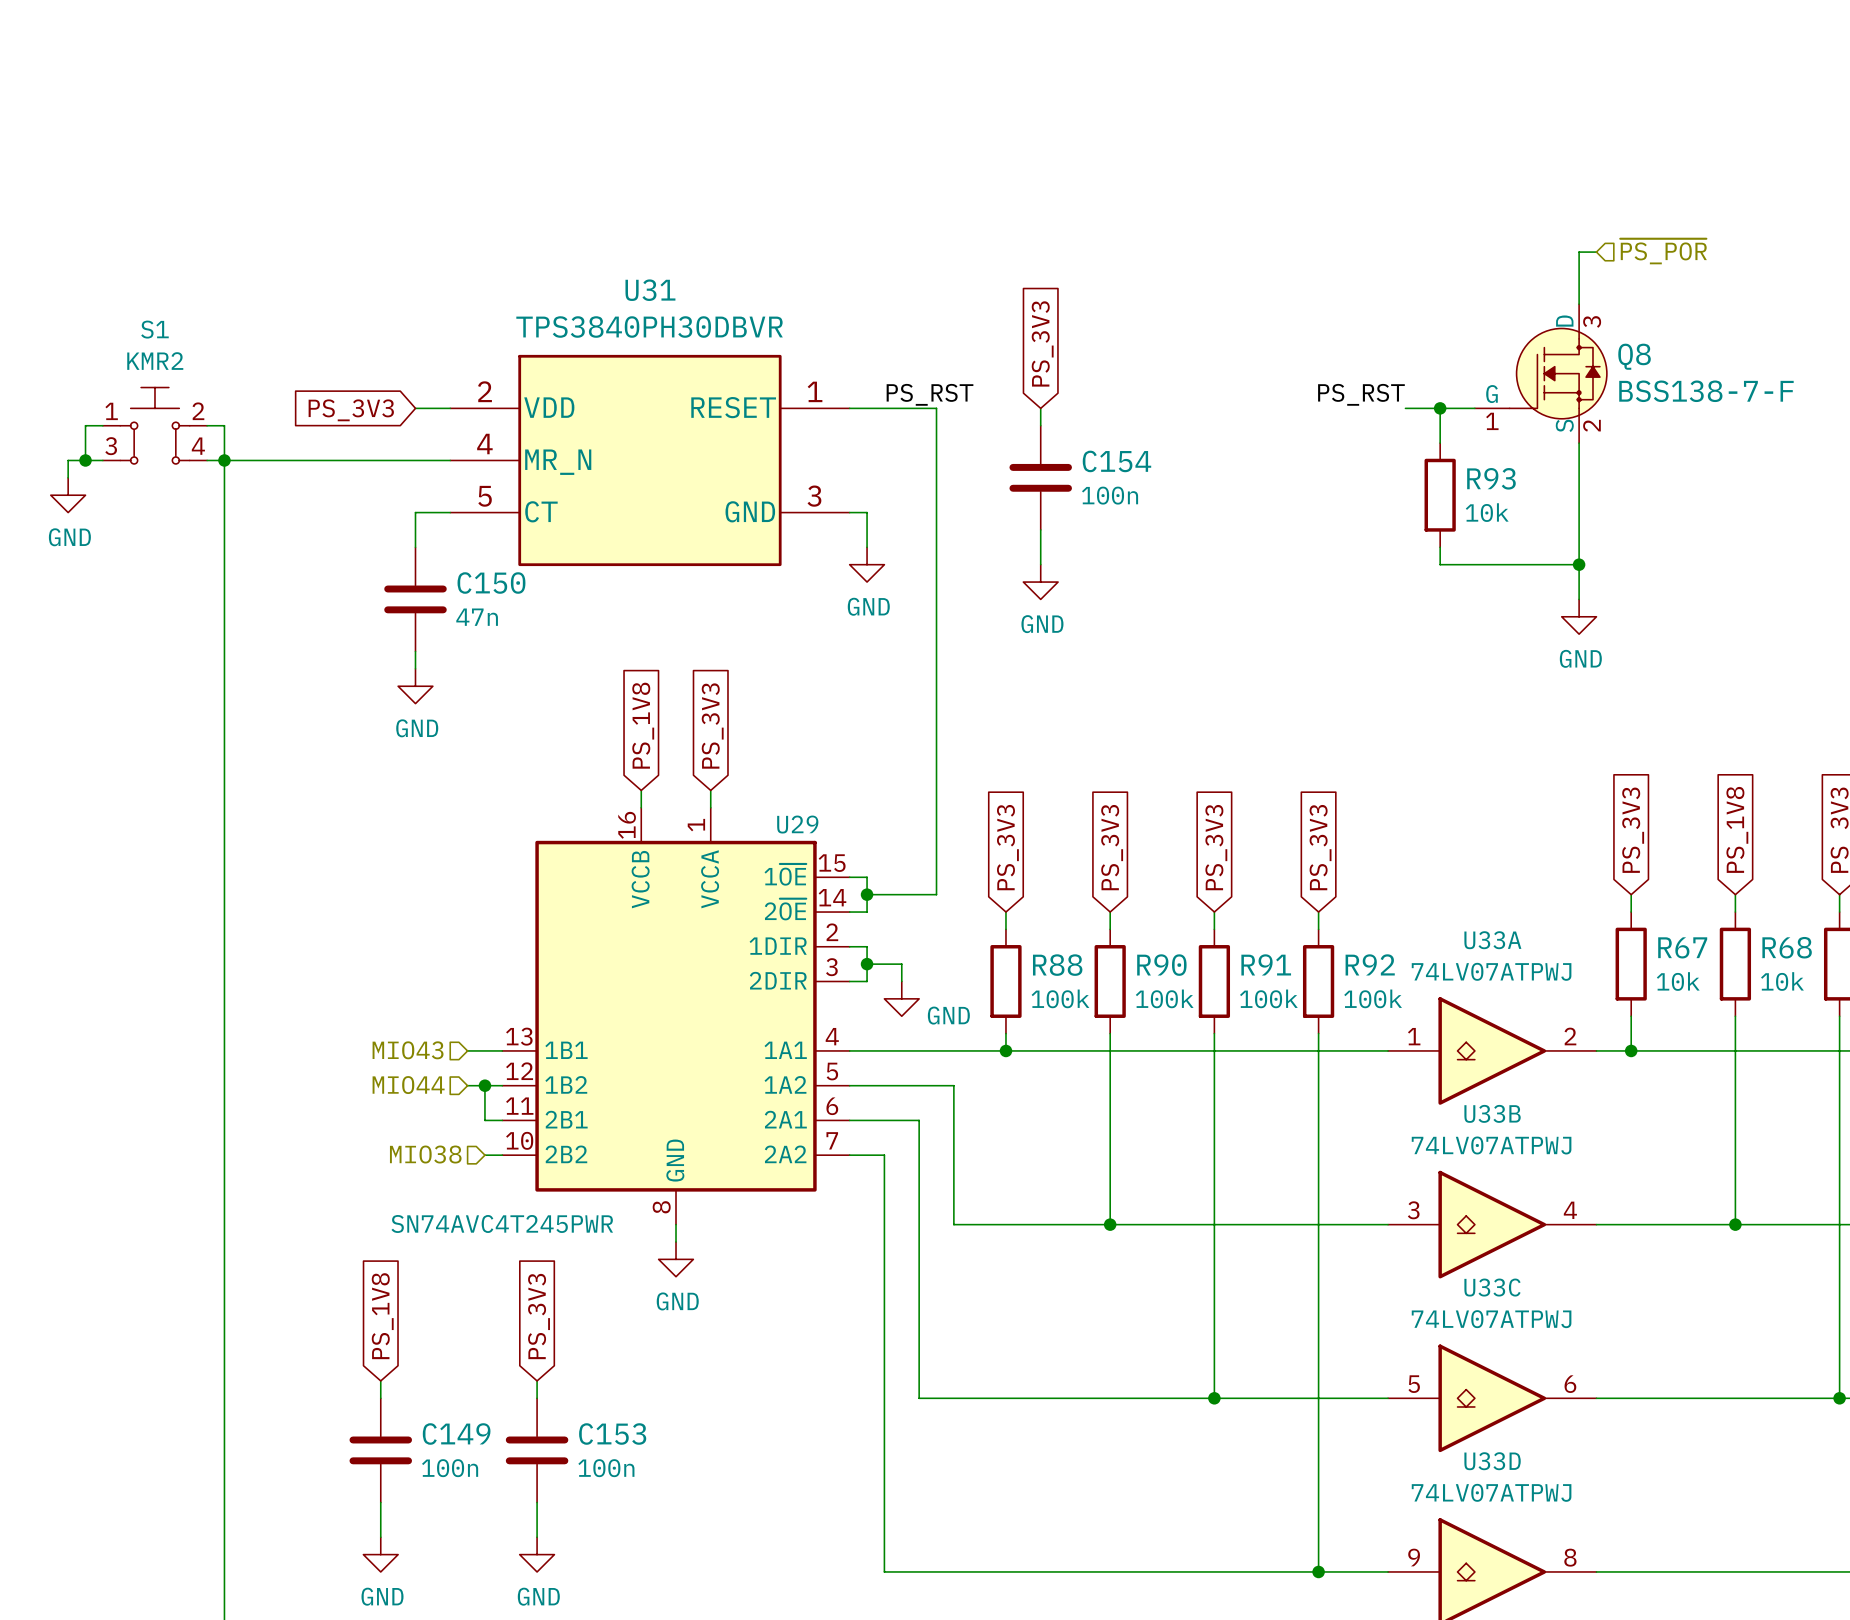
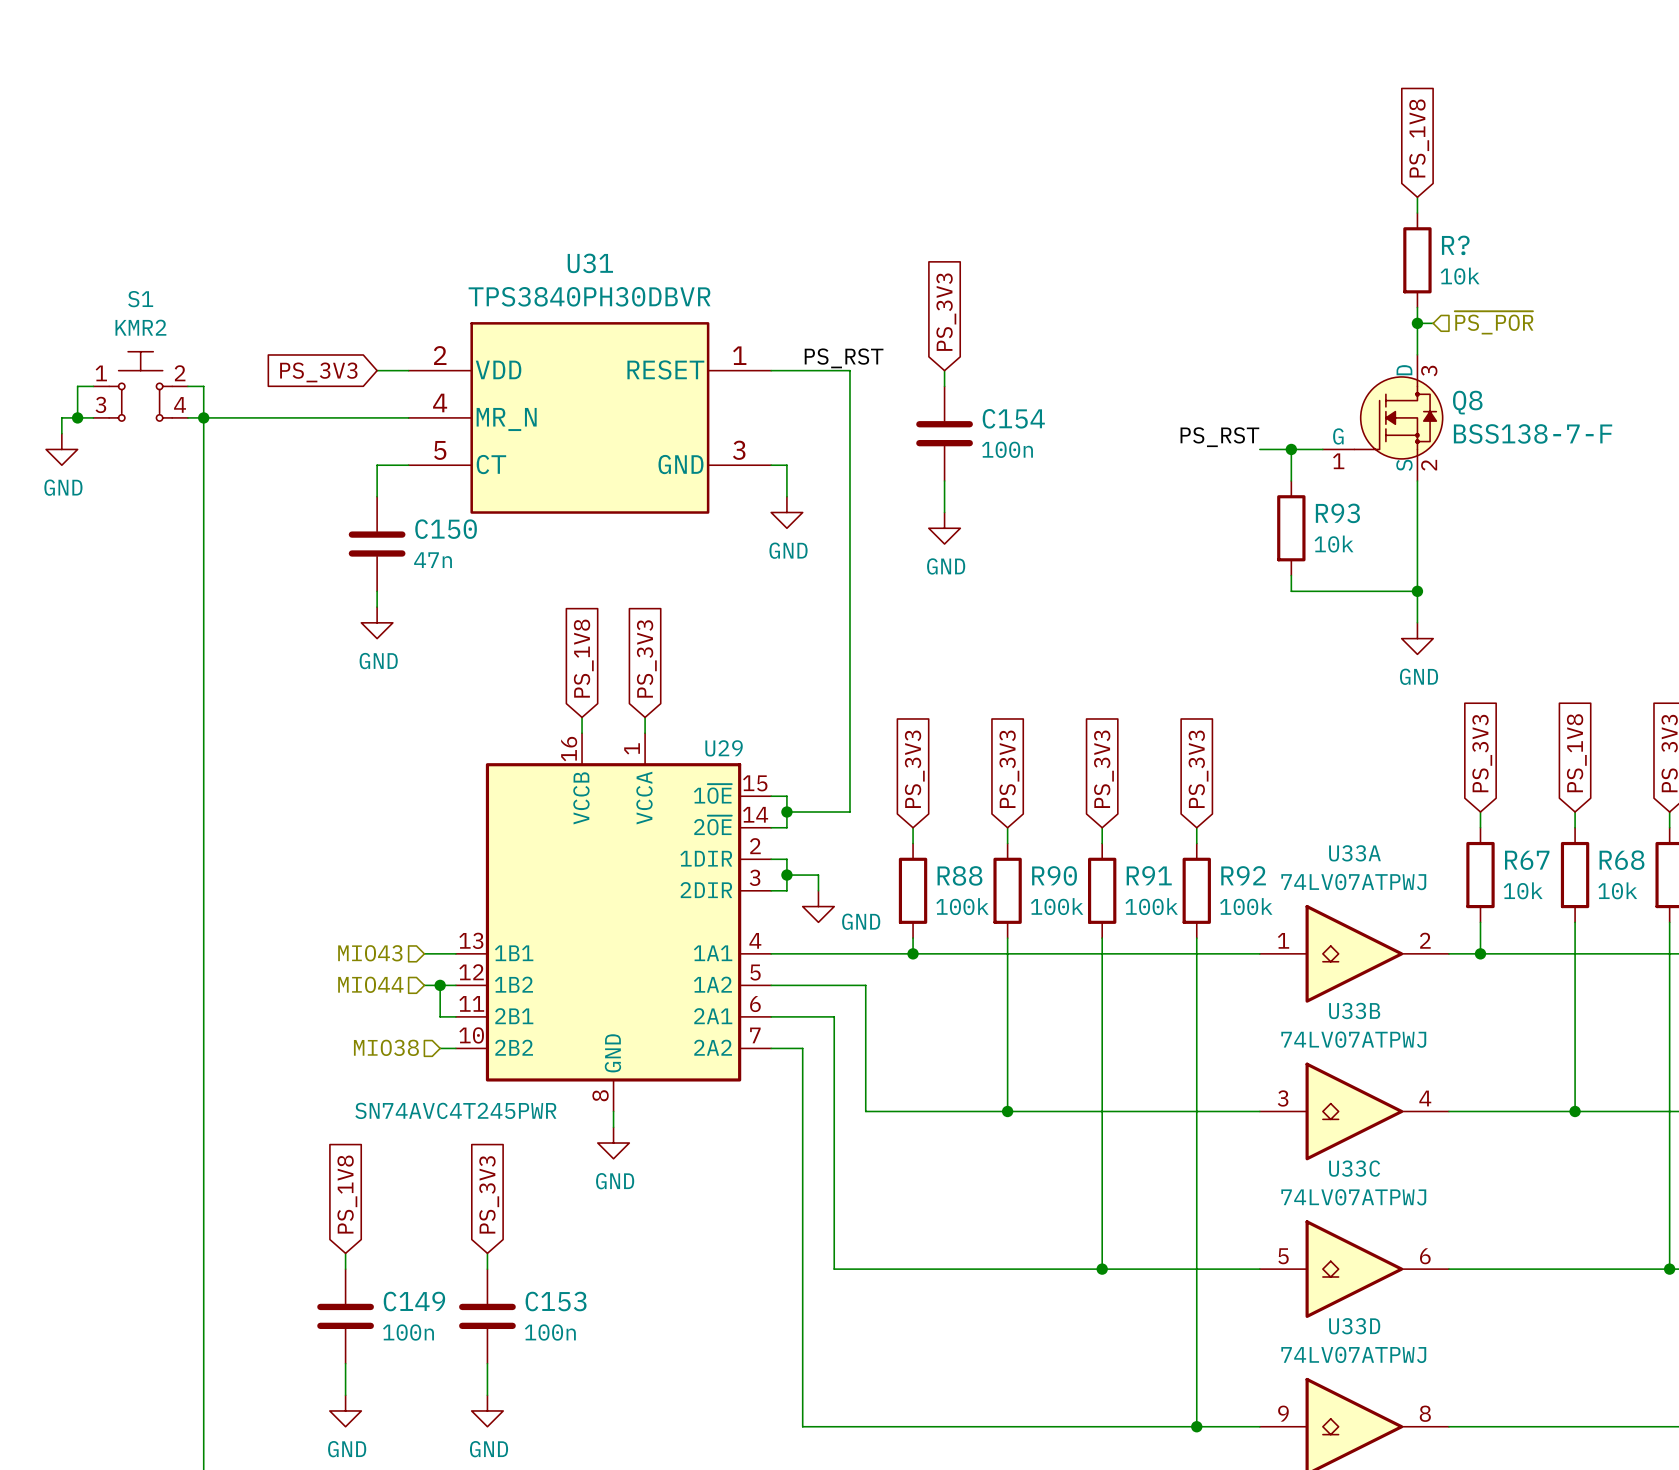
global label: none -> PS_1V8 (1419, 138)
wire: none -> (1417, 197) (1417, 213)
hierarchical label position: ~{PS_POR} (1663, 251) -> ~{PS_POR} (1494, 322)
wire: (1596, 252) (1579, 252) (1579, 304) -> none
R?: none -> (1417, 260)
junction: none -> (1417, 323)
Q8 position: (1540, 373) -> (1382, 417)
label position: PS_RST (1361, 394) -> PS_RST (1219, 437)
wire: (1405, 408) (1474, 408) -> (1259, 449) (1322, 449)
wire: (1440, 408) (1440, 443) -> (1291, 449) (1291, 480)
junction: (1440, 408) -> none
wire: (1579, 443) (1579, 599) -> (1417, 480) (1417, 622)
junction: none -> (1291, 449)
R93 position: (1440, 495) -> (1291, 528)
wire: (1440, 547) (1440, 564) (1579, 564) -> (1291, 575) (1291, 591) (1417, 591)
junction: (1579, 564) -> none
power symbol position: GND (1579, 616) -> GND (1417, 638)
junction: none -> (1417, 591)

